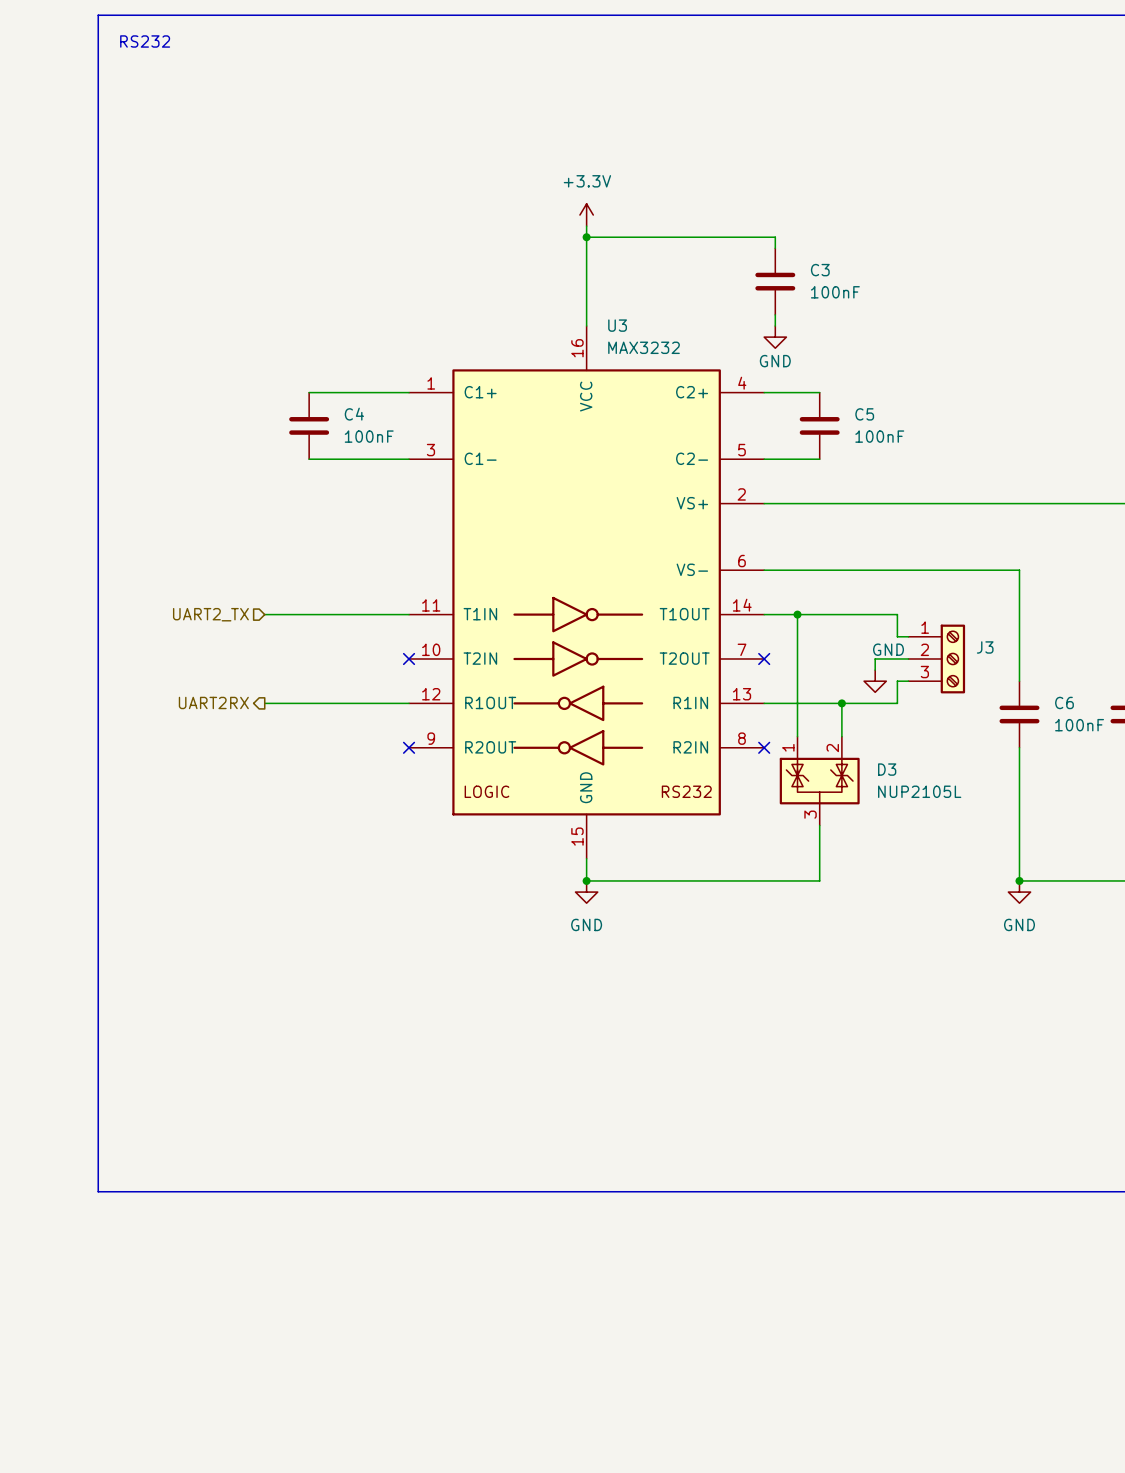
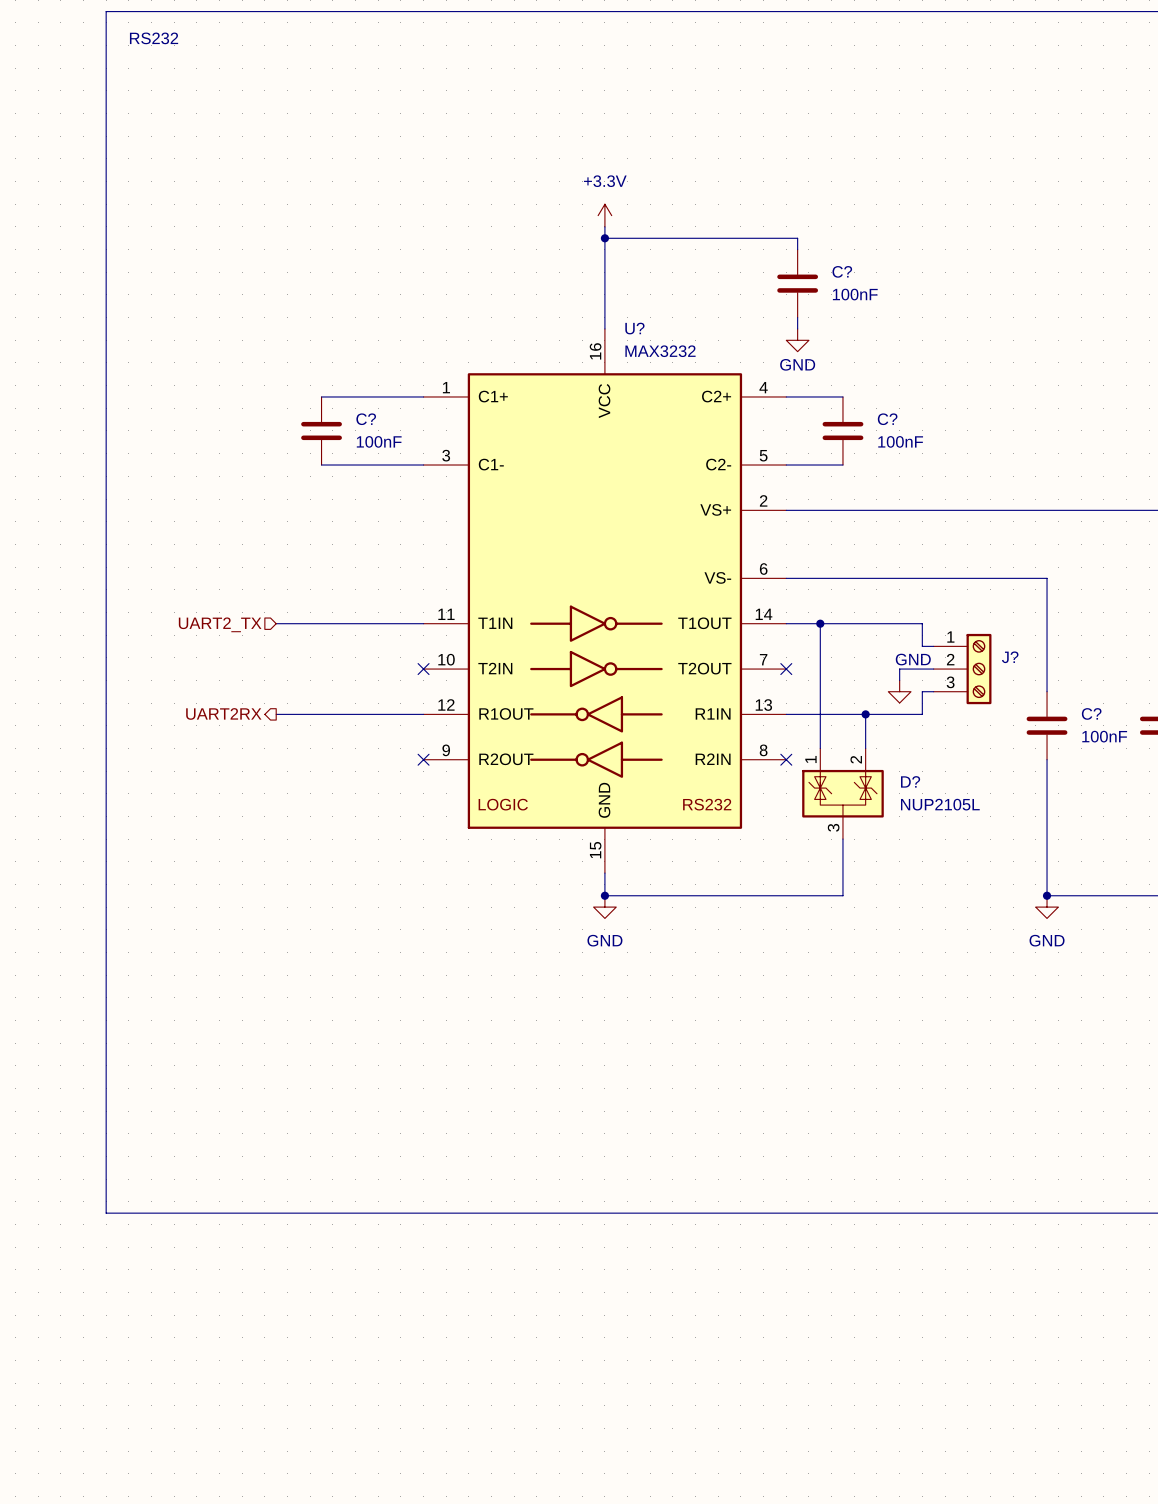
C3 name: C3 (820, 270) -> C? (842, 271)
U3 name: U3 (617, 325) -> U? (634, 328)
C4 name: C4 (354, 414) -> C? (366, 419)
C5 name: C5 (864, 414) -> C? (887, 419)
J3 name: J3 (985, 647) -> J? (1010, 657)
C6 name: C6 (1064, 702) -> C? (1091, 713)
D3 name: D3 (887, 769) -> D? (910, 781)

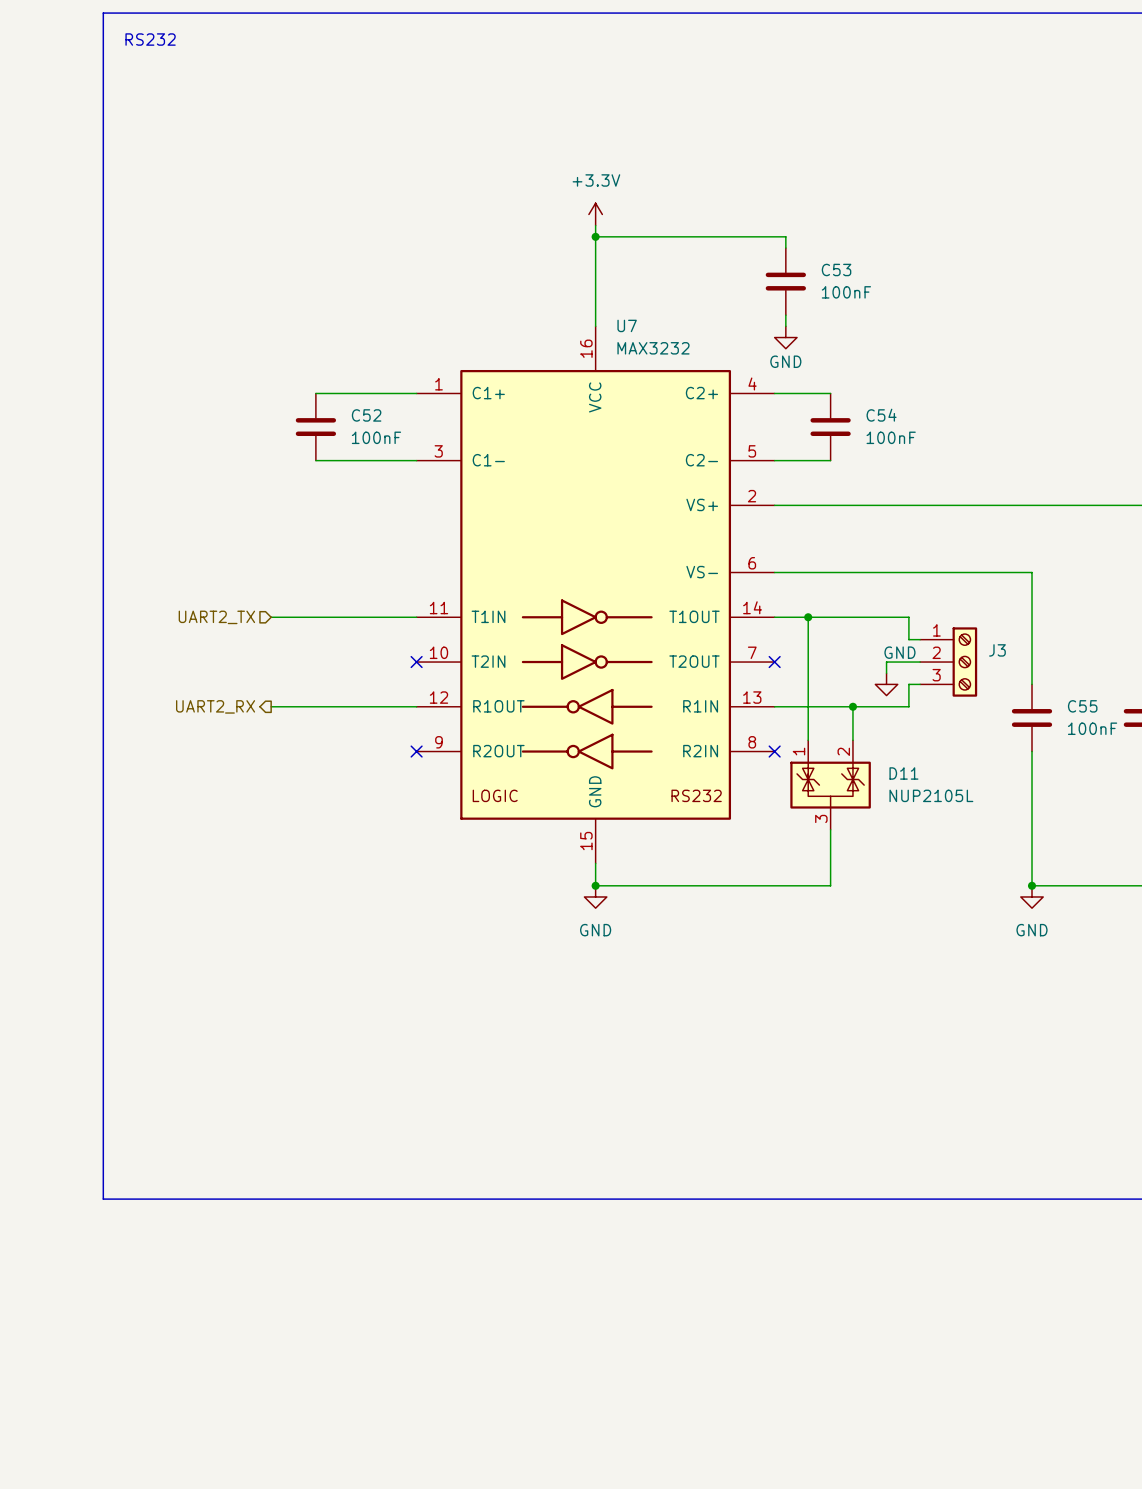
C? name: C? (842, 271) -> C53 (836, 269)
U? name: U? (634, 328) -> U7 (627, 325)
C? name: C? (366, 419) -> C52 (366, 415)
C? name: C? (887, 419) -> C54 (881, 415)
J? name: J? (1010, 657) -> J3 (997, 650)
hierarchical label: UART2RX (223, 713) -> UART2_RX (215, 706)
C? name: C? (1091, 713) -> C55 (1082, 706)
D? name: D? (910, 781) -> D11 (903, 773)

